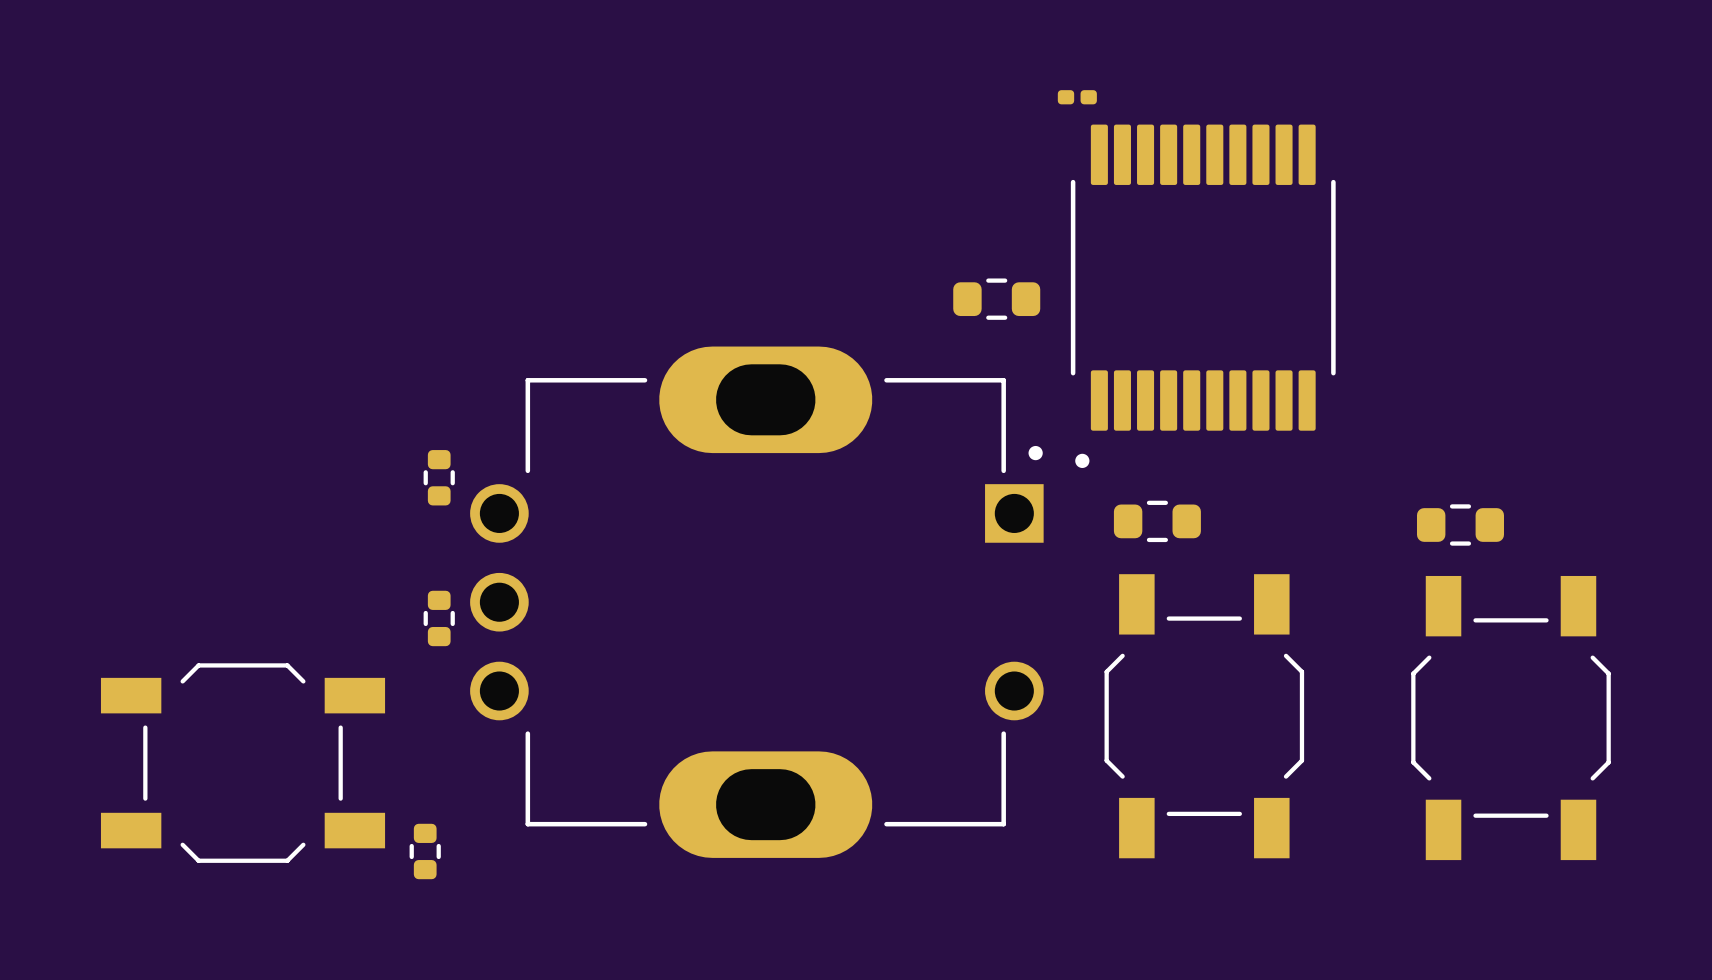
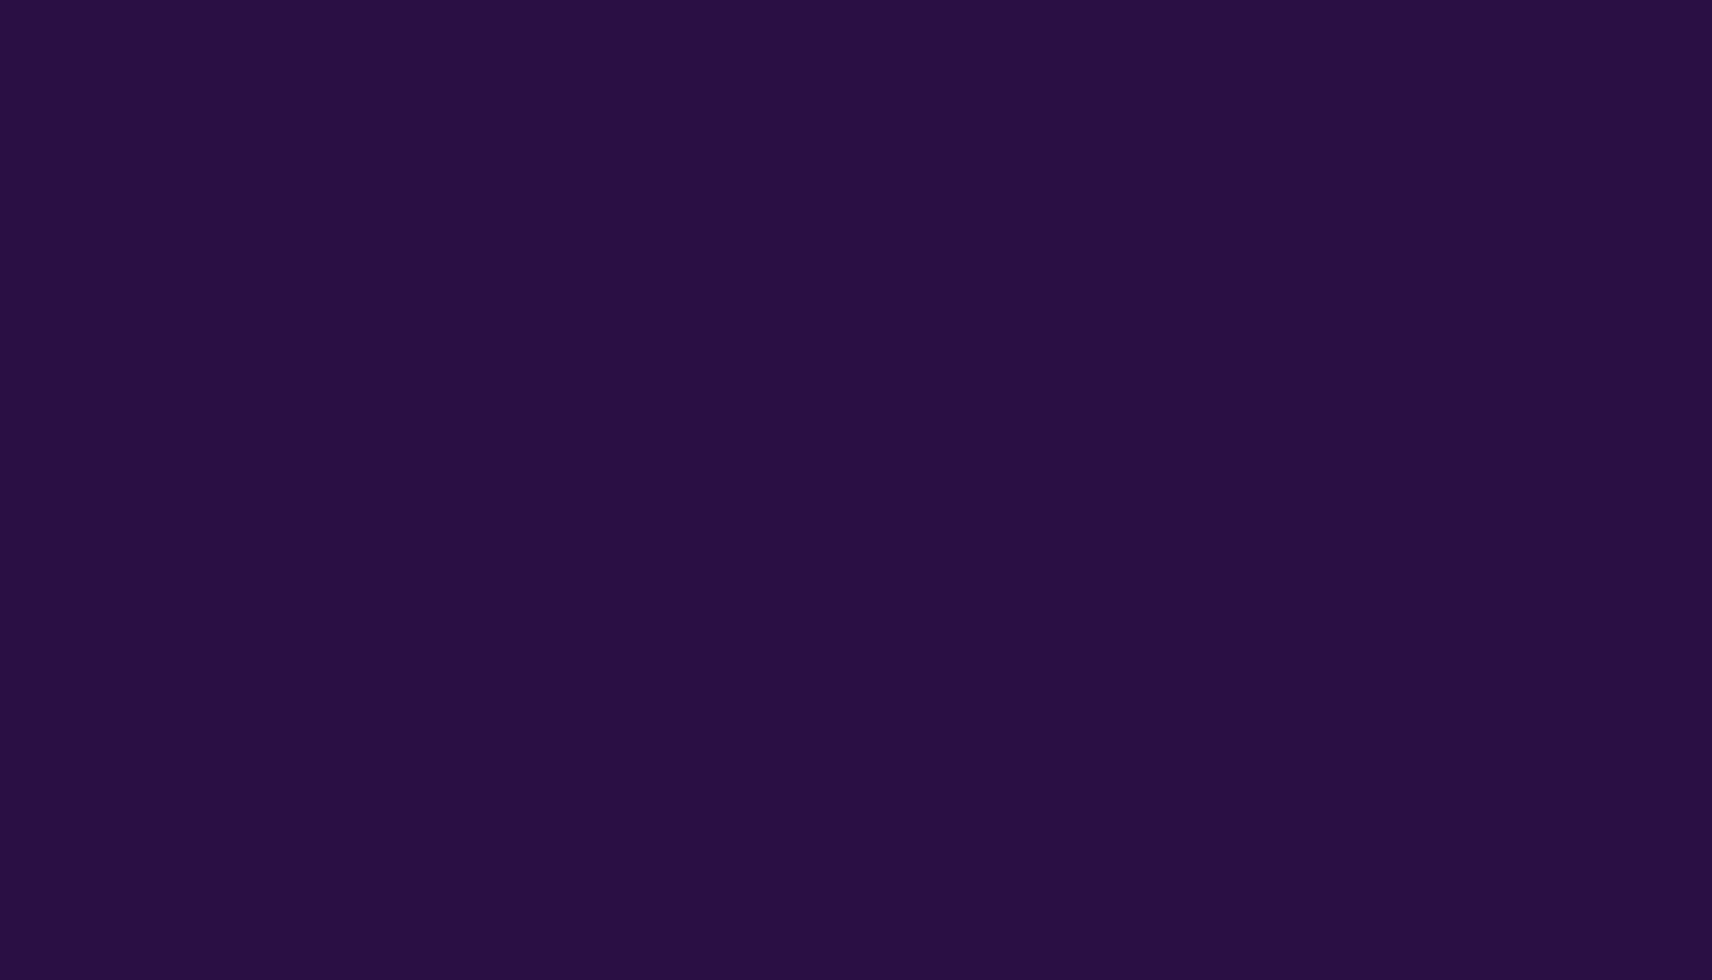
part: (1077, 97) -> none
part: (1203, 296) -> none
part: (996, 299) -> none
part: (439, 477) -> none
part: (1157, 521) -> none
part: (1460, 524) -> none
part: (756, 602) -> none
part: (439, 618) -> none
part: (1204, 716) -> none
part: (1511, 718) -> none
part: (243, 763) -> none
part: (425, 851) -> none

